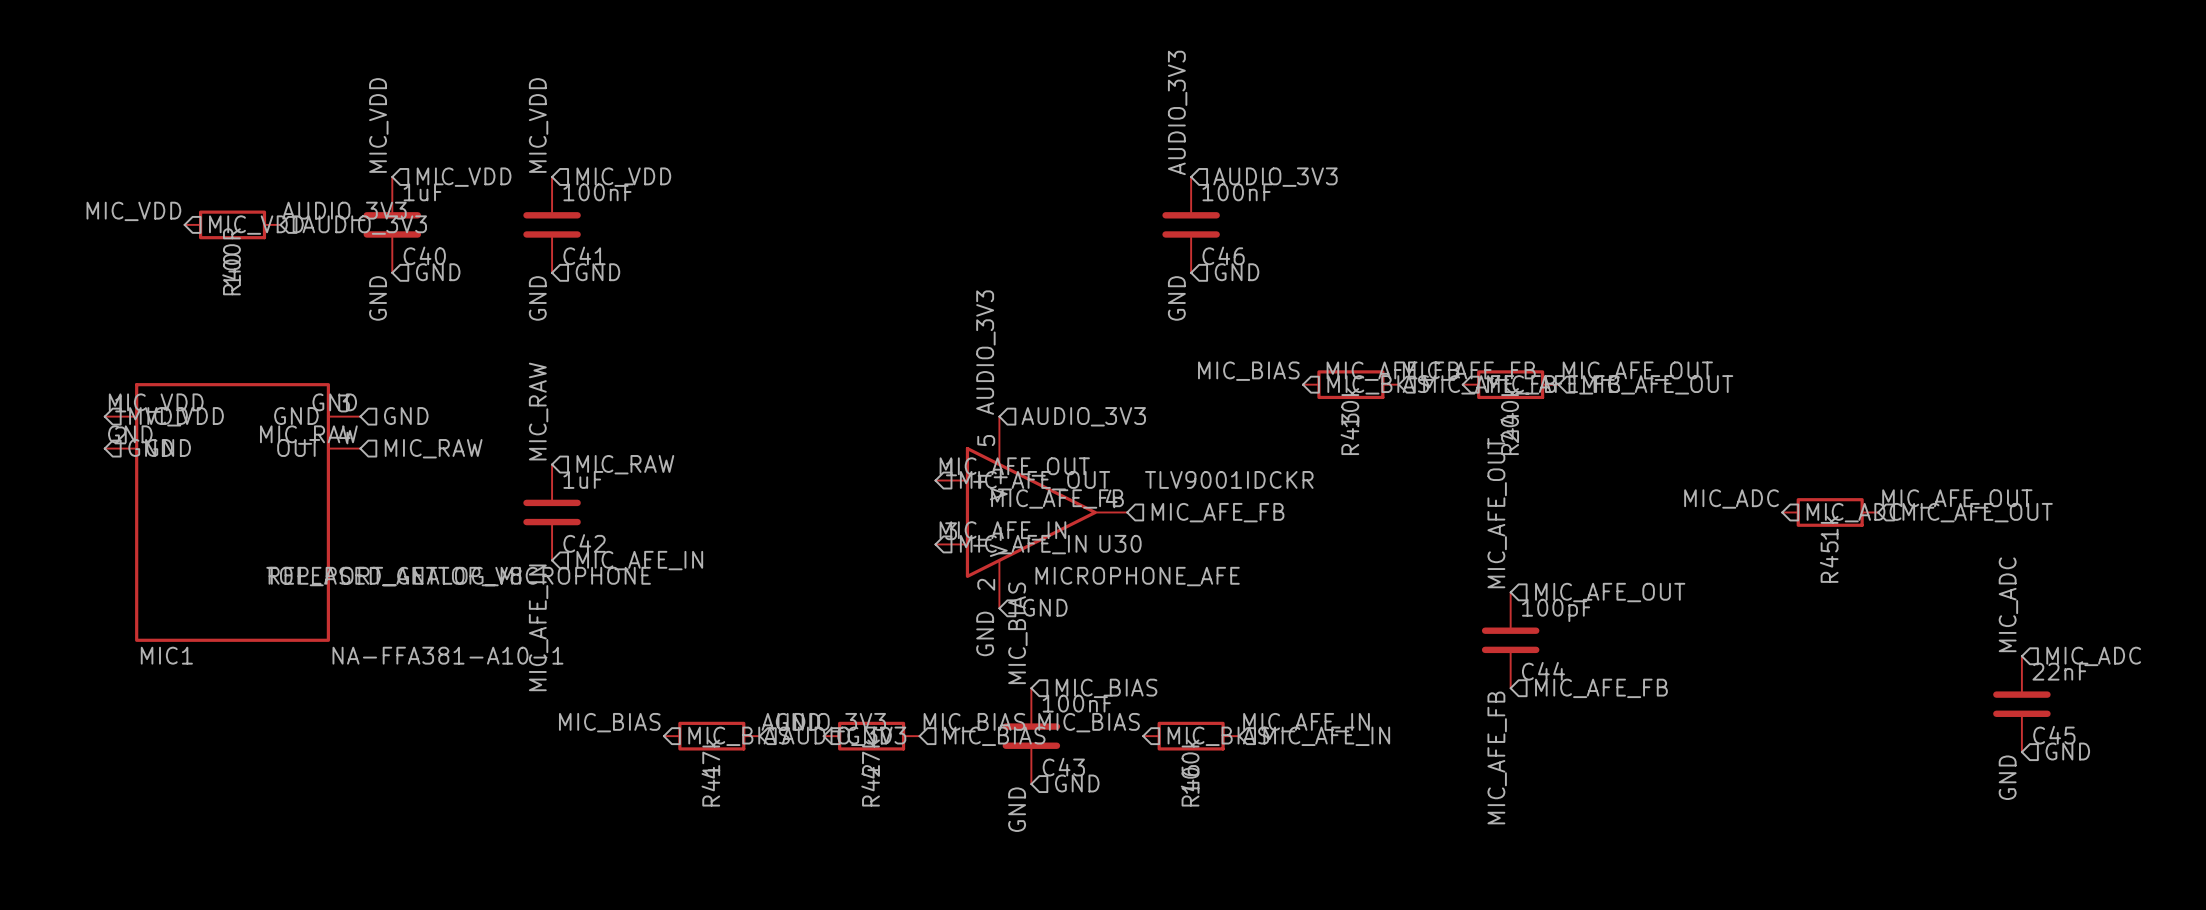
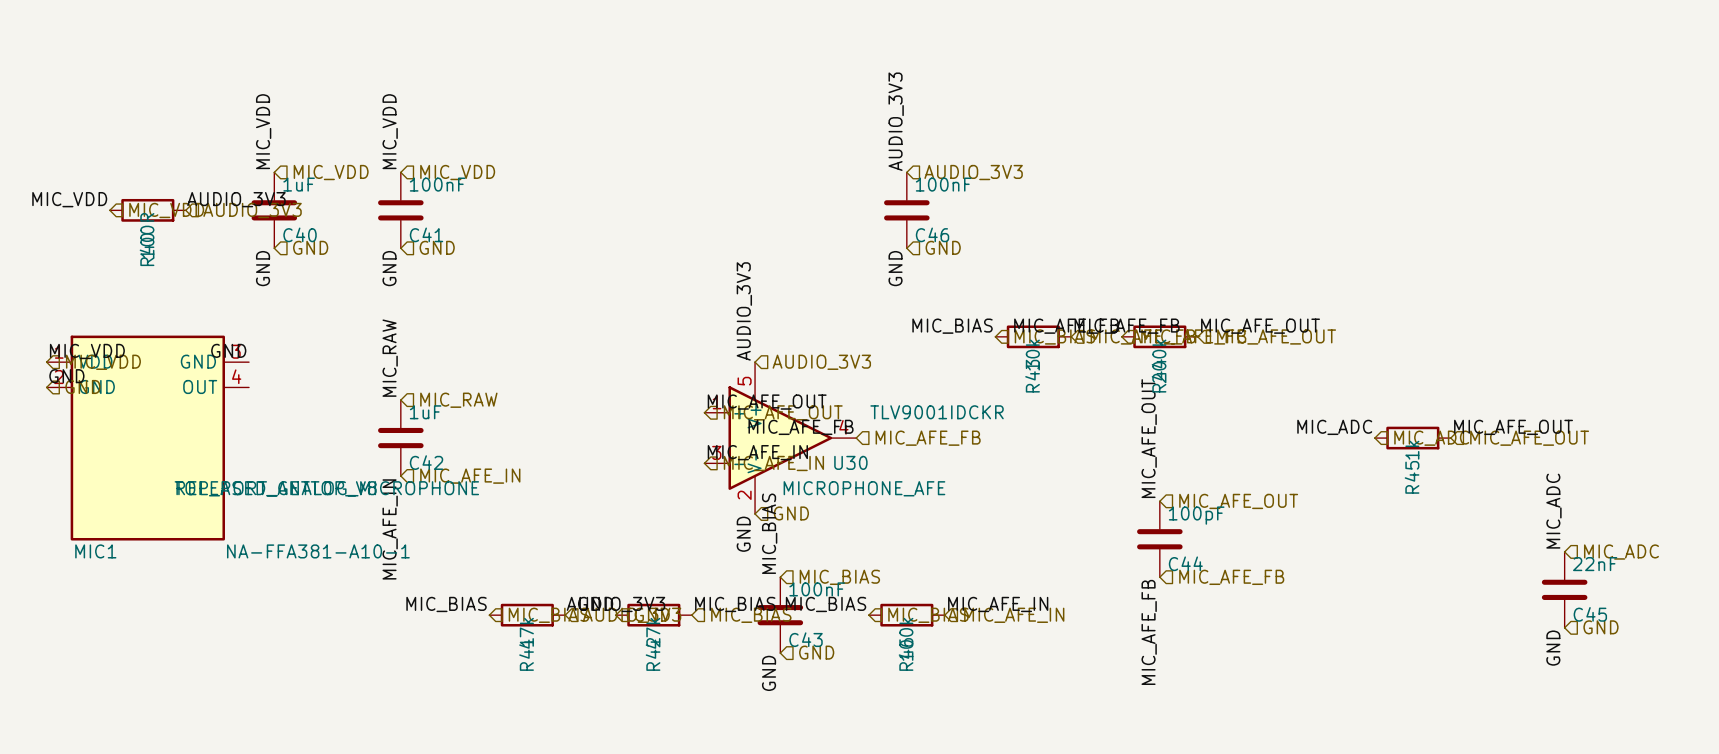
hierarchical label: GND (406, 416) -> none
label: MIC_RAW (308, 435) -> none
hierarchical label: MIC_RAW (433, 448) -> none

